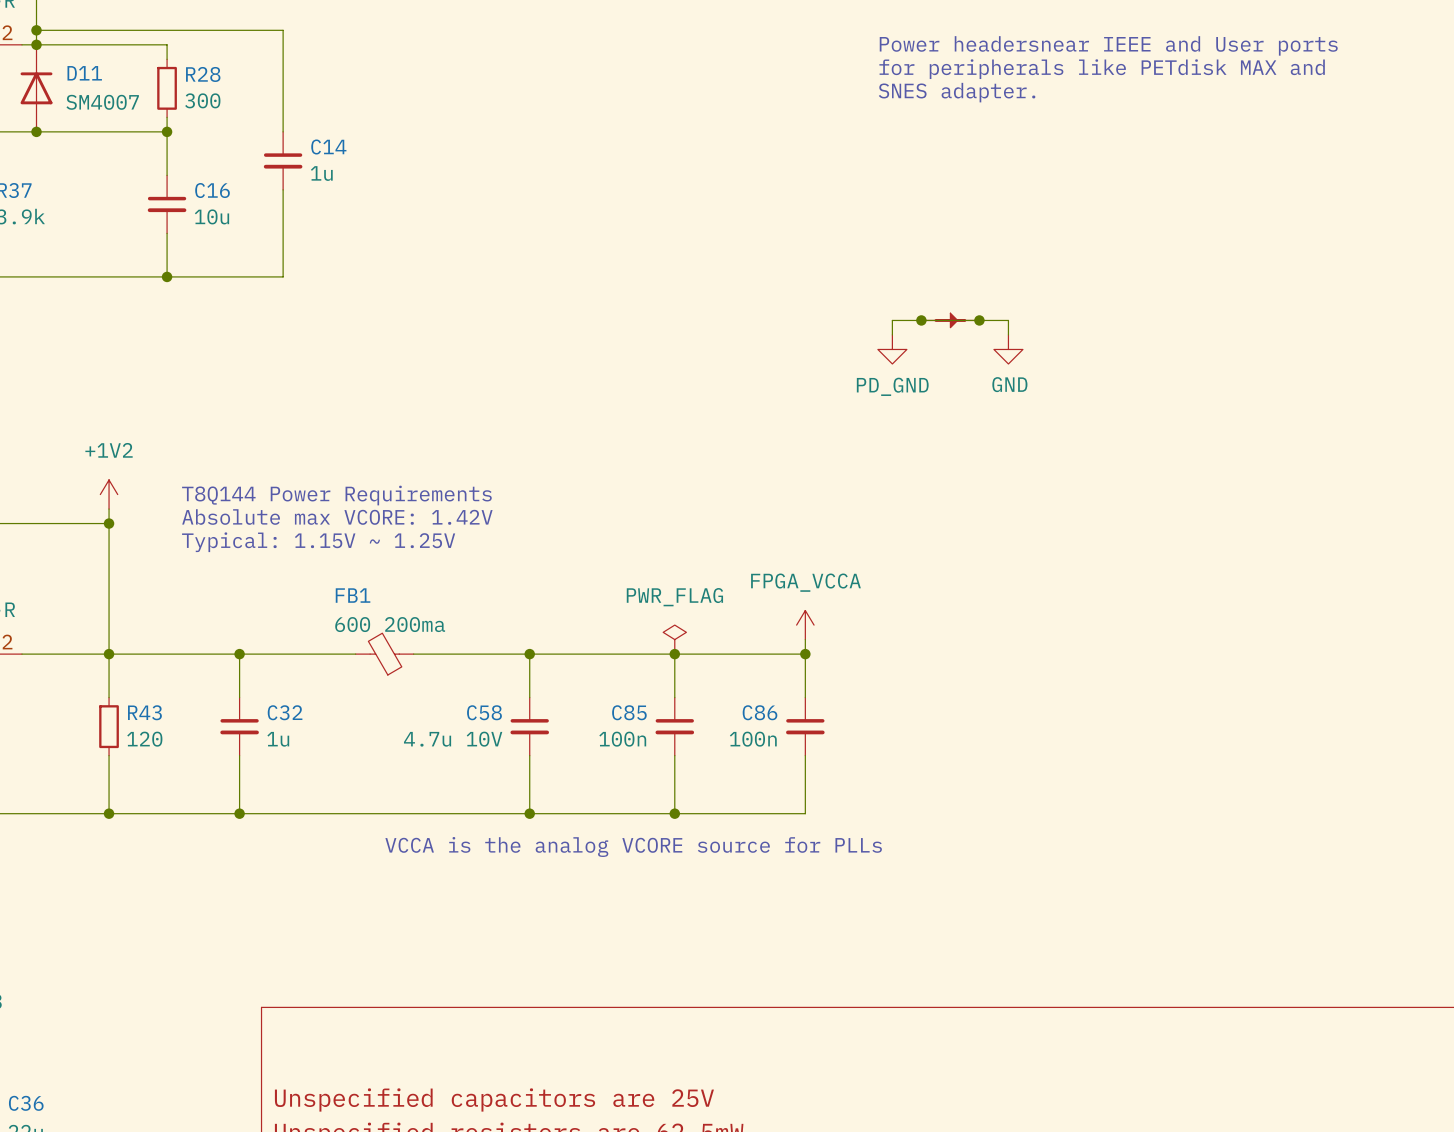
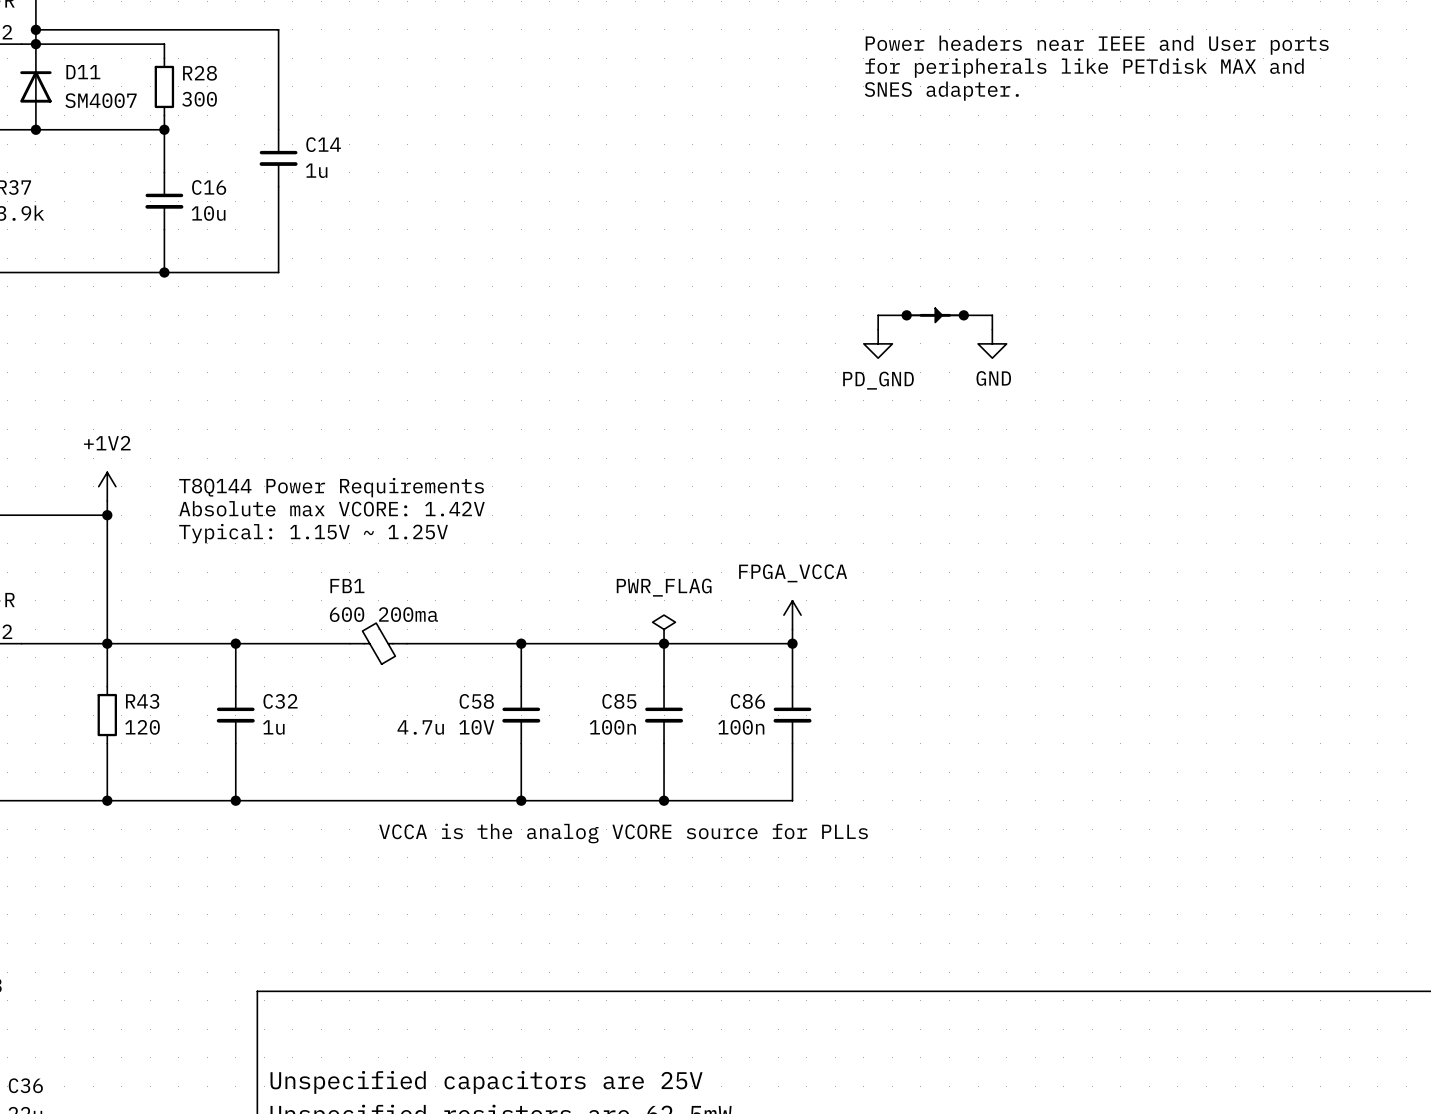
text: Power headersnear IEEE and User ports (1108, 45) -> Power headers near IEEE and User ports (1097, 45)

